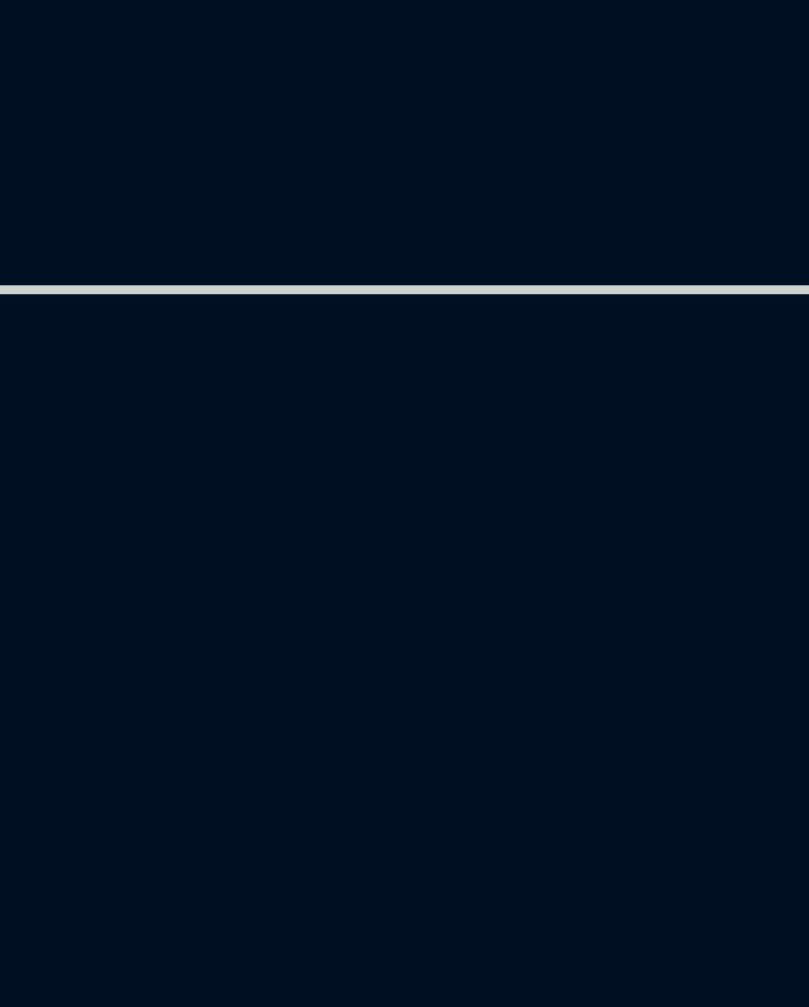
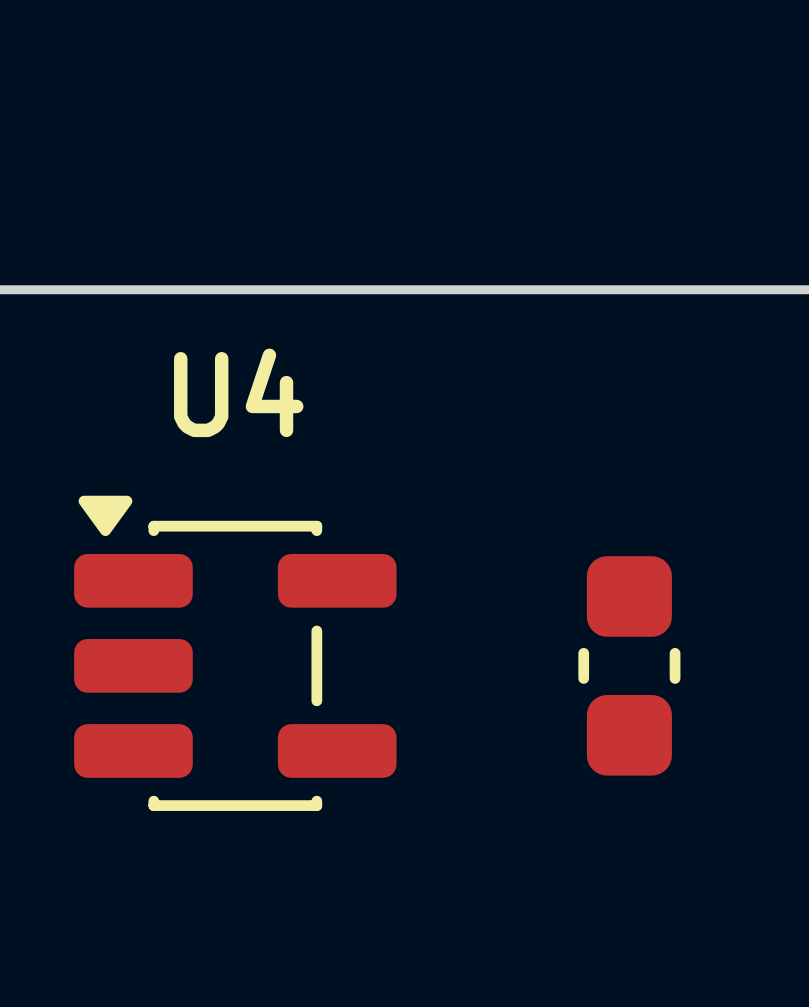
U4: none -> (235, 653)
part: none -> (629, 665)

